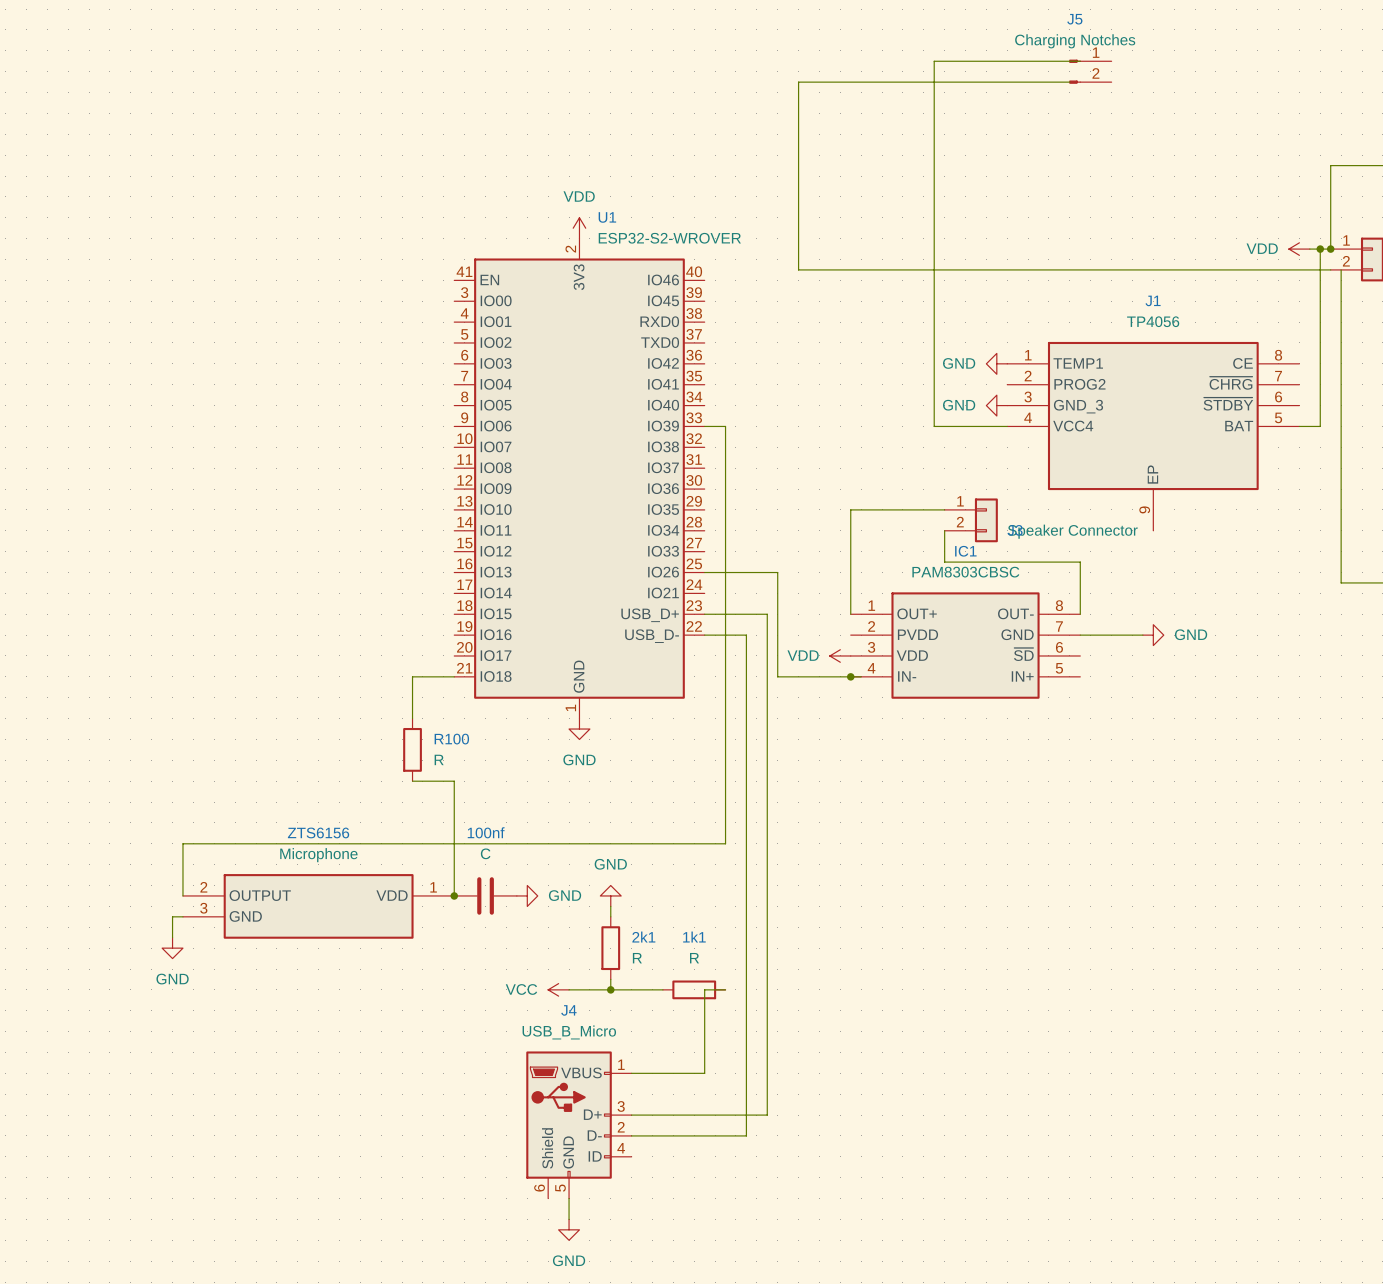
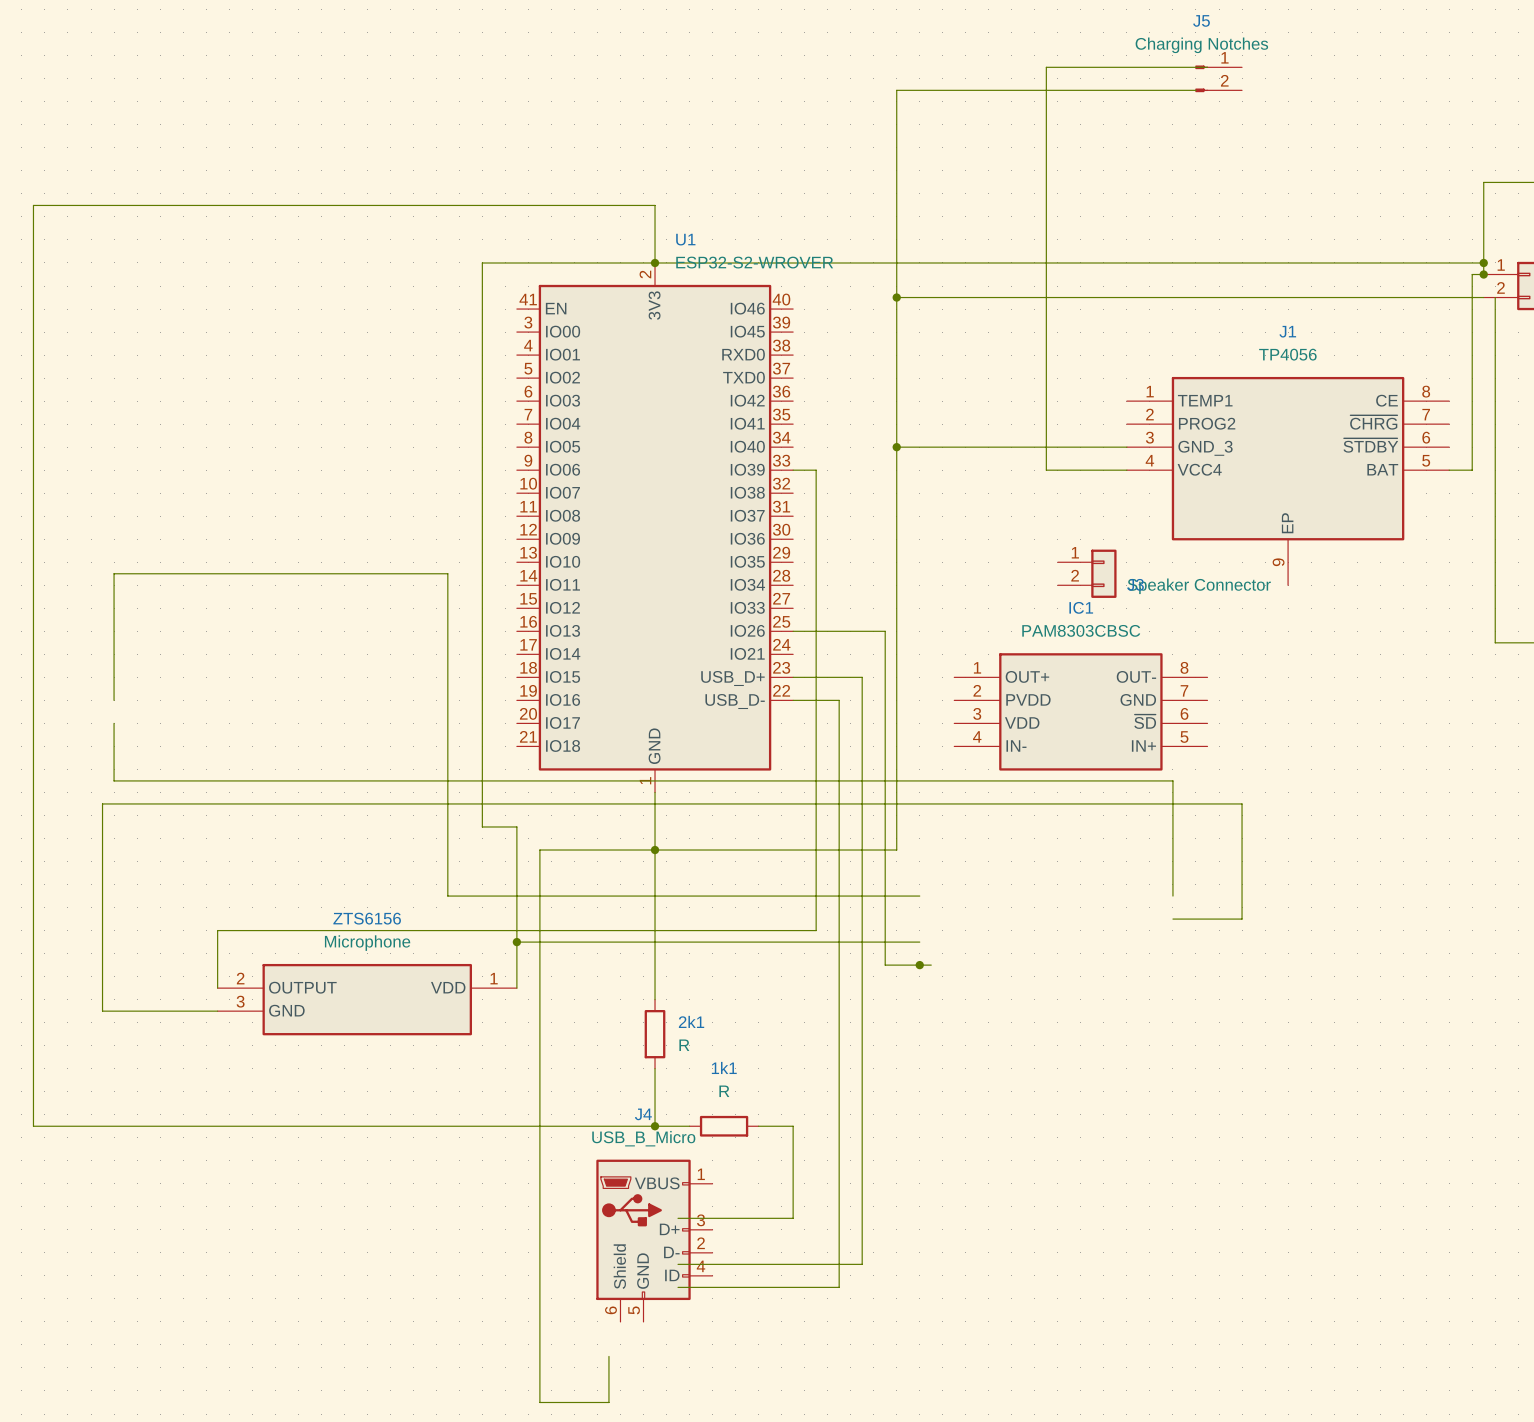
power symbol: VDD (579, 228) -> none
wire: none -> (655, 262) (655, 205) (33, 205) (33, 1126) (689, 1126)
junction: none -> (655, 262)
power symbol: VDD (1299, 249) -> none
wire: (1309, 249) (1320, 249) -> none
junction position: (1320, 249) -> (1483, 262)
wire: none -> (896, 297) (896, 850) (539, 850) (539, 1402) (608, 1402) (608, 1356)
junction: none -> (896, 297)
power symbol: GND (996, 363) -> none
wire: none -> (896, 447) (1126, 447)
junction: none -> (896, 447)
power symbol: GND (996, 405) -> none
wire: (944, 509) (850, 509) (850, 614) -> none
wire: (944, 530) (944, 562) (1080, 562) (1080, 614) -> none
wire: (777, 572) (777, 676) (861, 676) -> (873, 631) (885, 631) (885, 965) (931, 965)
wire: none -> (114, 700) (114, 573) (447, 573) (447, 896) (919, 896)
wire: (1080, 635) (1142, 635) -> none
power symbol: GND (1153, 635) -> none
wire: none -> (114, 723) (114, 780) (1172, 780) (1172, 896)
power symbol: VDD (840, 655) -> none
wire: (454, 676) (412, 676) (412, 718) -> none
junction: (850, 676) -> none
wire: none -> (655, 792) (655, 999)
power symbol: GND (579, 729) -> none
R100: R (412, 749) -> none
junction: none -> (655, 850)
wire: (412, 781) (454, 781) -> (1483, 262) (482, 262) (482, 826) (516, 826) (516, 861)
wire: none -> (516, 942) (919, 942)
junction: none -> (919, 965)
junction position: (454, 895) -> (516, 942)
100nf: C (485, 895) -> none
power symbol: GND (527, 895) -> none
power symbol: GND (610, 895) -> none
wire: (610, 906) (610, 916) -> none
wire: (172, 916) (172, 937) -> (206, 1011) (102, 1011) (102, 803) (1242, 803) (1242, 919) (1172, 919)
power symbol: GND (172, 948) -> none
2k1 position: (610, 948) -> (655, 1034)
wire: none -> (655, 1068) (655, 1126)
wire: (610, 979) (610, 989) -> none
power symbol: VCC (558, 989) -> none
wire: (569, 989) (662, 989) -> none
junction position: (610, 989) -> (655, 1126)
1k1 position: (694, 989) -> (724, 1126)
wire: (725, 989) (704, 989) (704, 1021) -> (758, 1126) (793, 1126)
wire: (631, 1073) (704, 1073) -> (678, 1218) (793, 1218) (793, 1183)
wire: (631, 1115) (767, 1115) -> (678, 1264) (862, 1264) (862, 1229)
wire: (631, 1135) (746, 1135) -> (678, 1287) (839, 1287) (839, 1252)
wire: (569, 1198) (569, 1219) -> none
power symbol: GND (569, 1229) -> none

